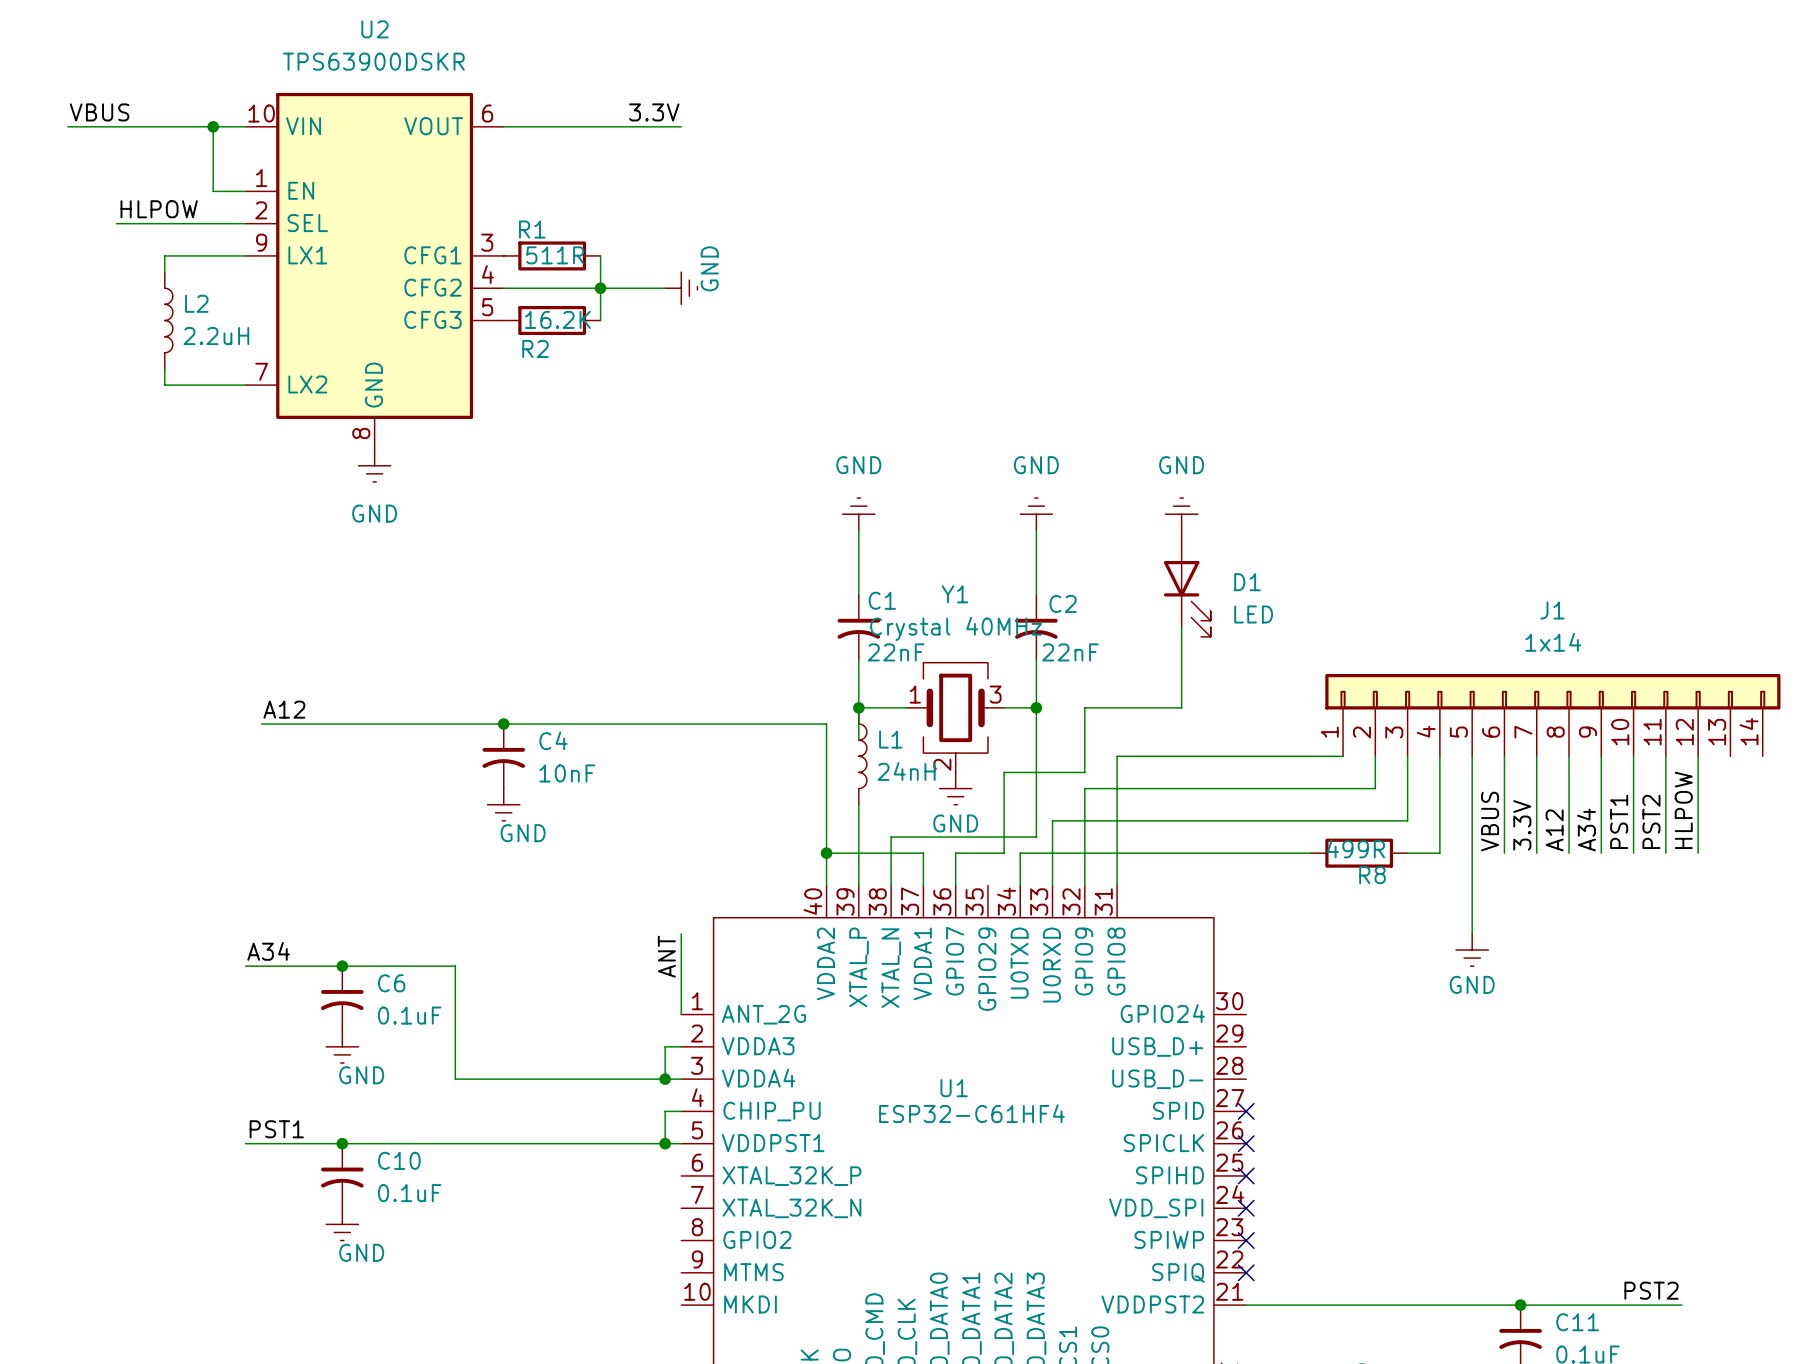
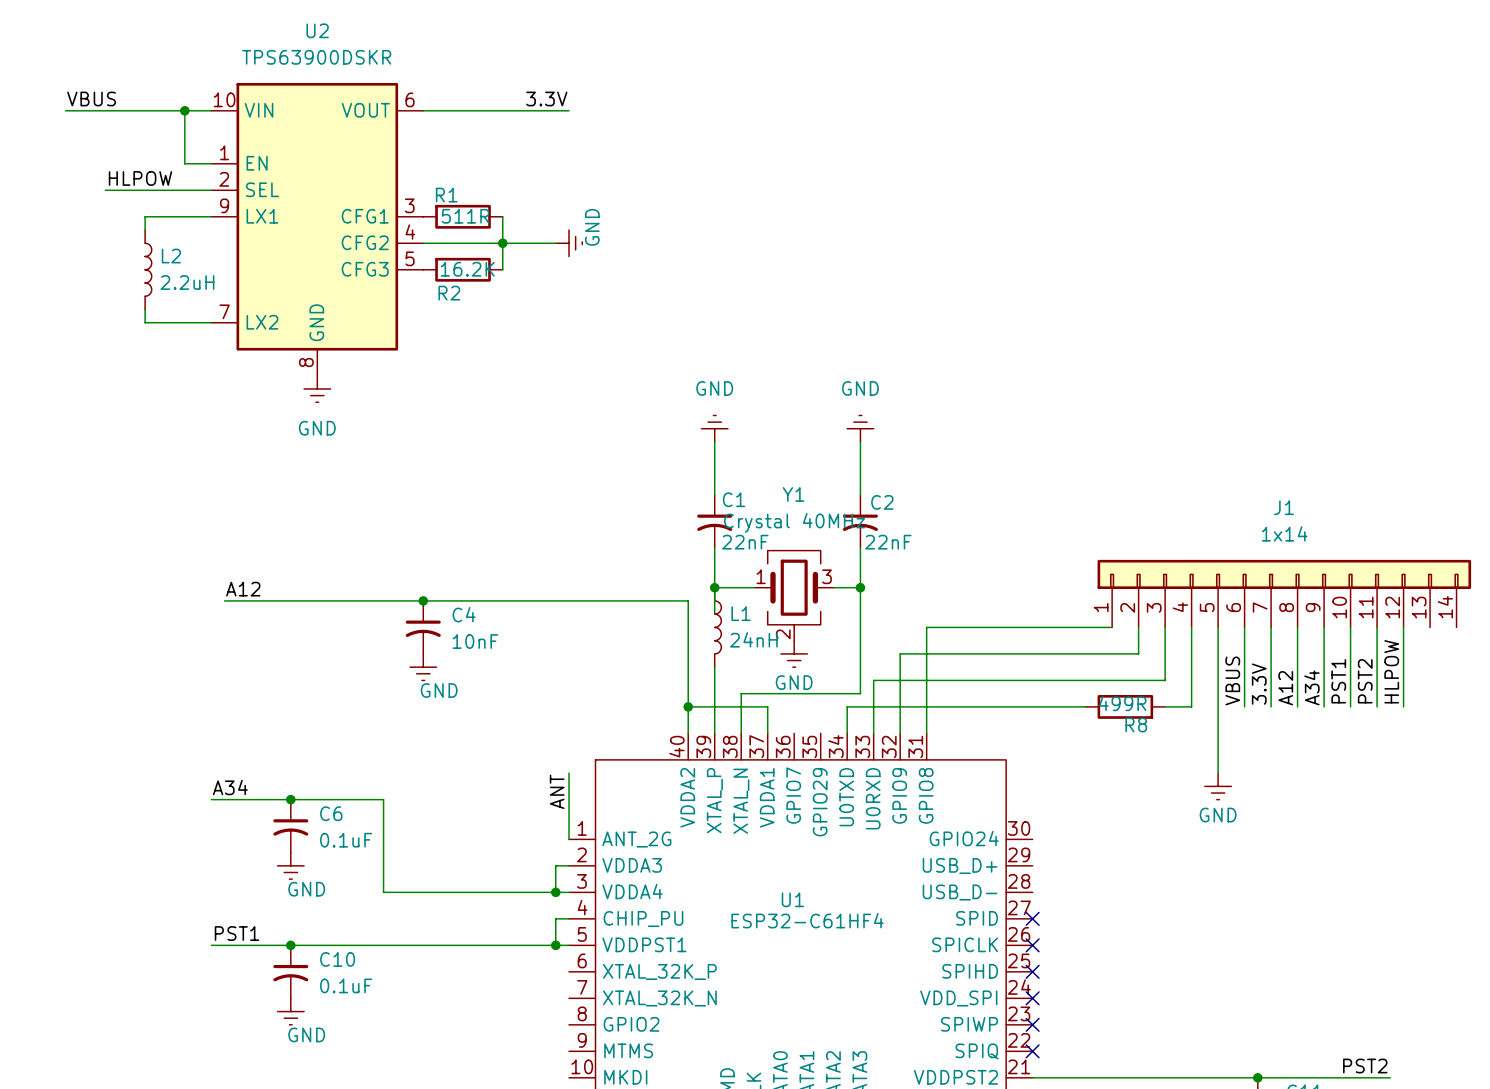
power symbol: GND (1181, 514) -> none
D1: LED (1187, 583) -> none
wire: (1181, 627) (1181, 707) (1084, 707) (1084, 772) (1004, 772) (1004, 853) (955, 853) (955, 885) -> none

